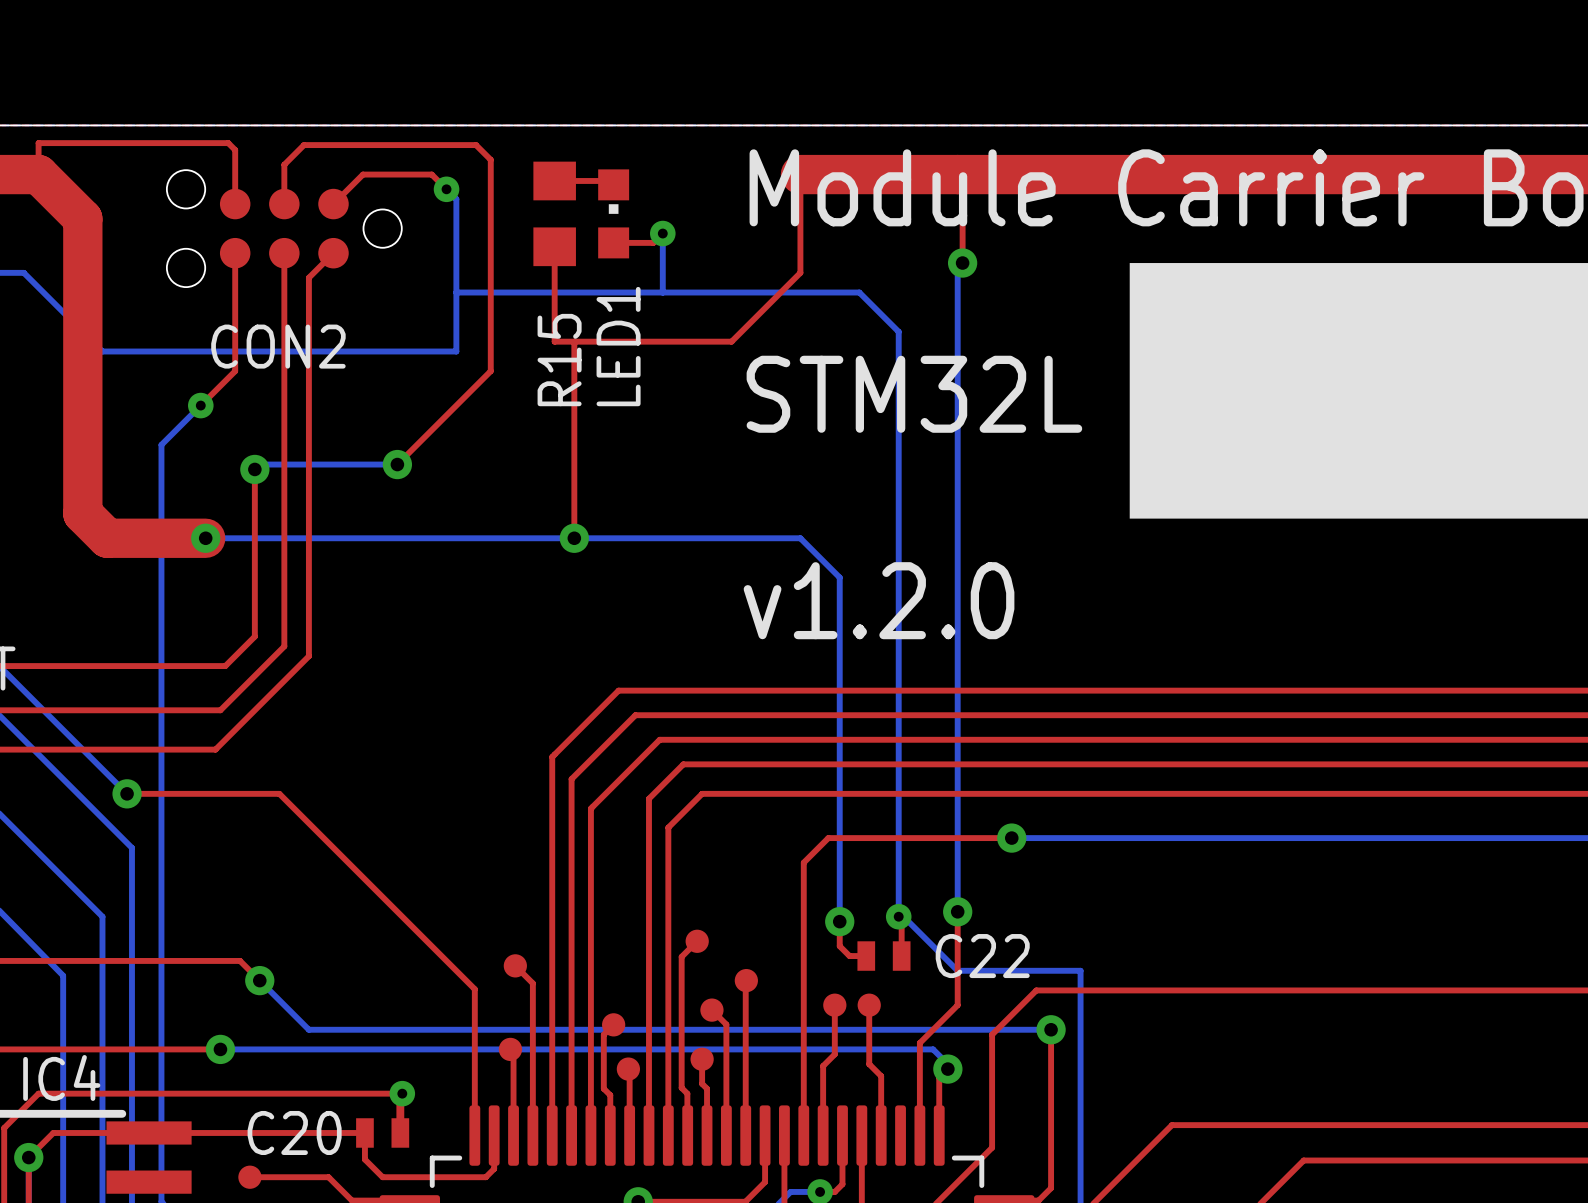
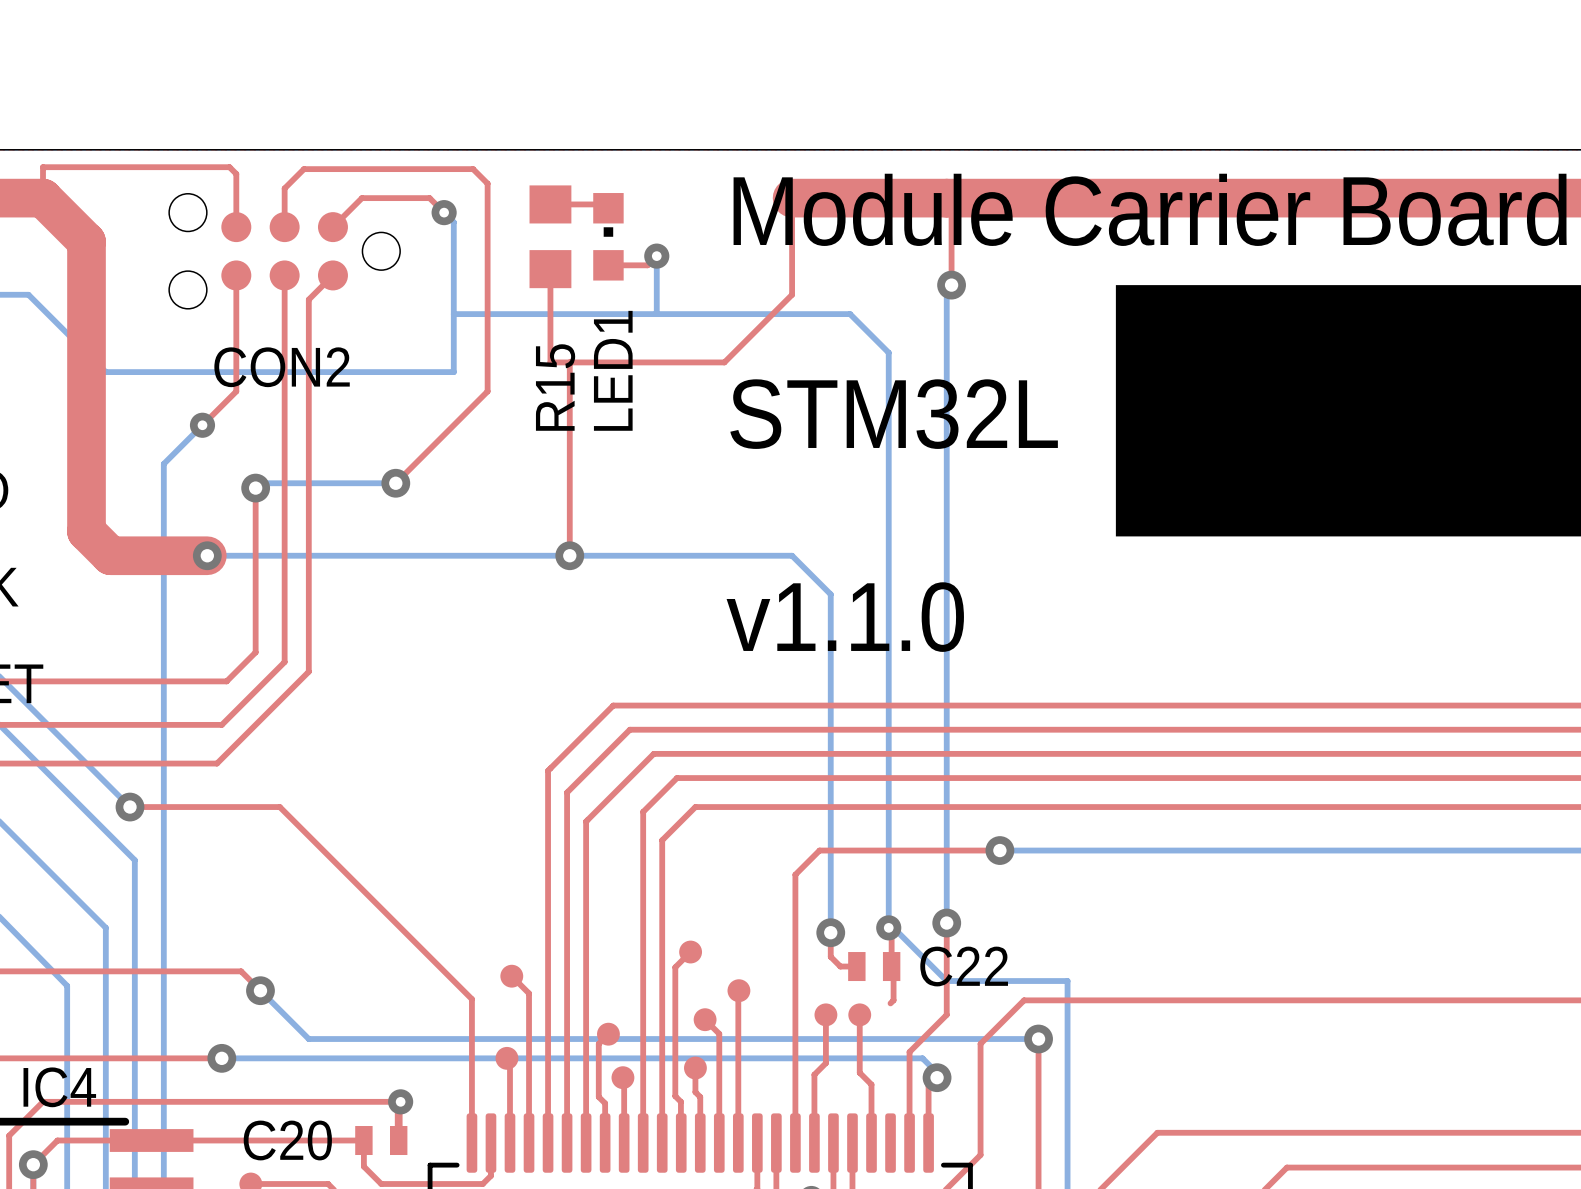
text: v1.2.0 (879, 600) -> v1.1.0 (845, 617)
top track: none -> (891, 966) (893, 968) (893, 1000) (890, 1003)

